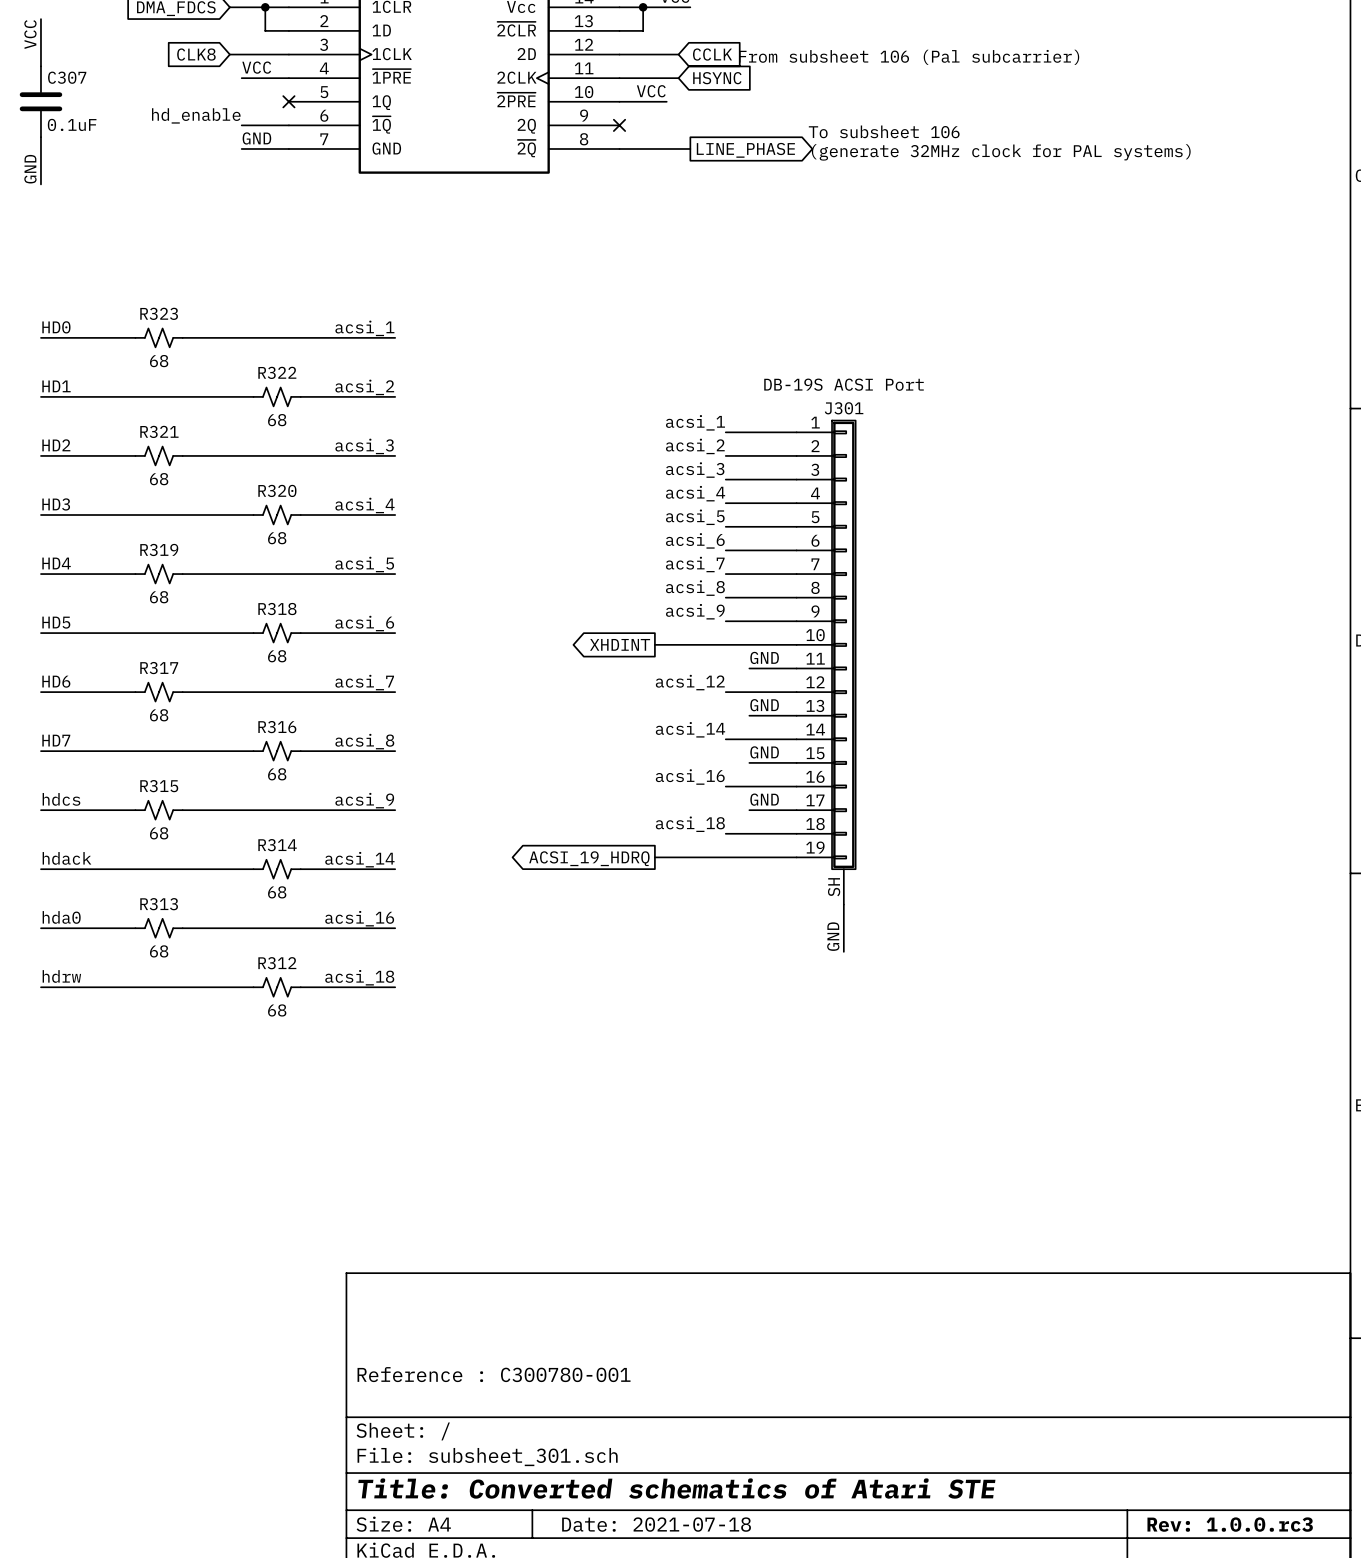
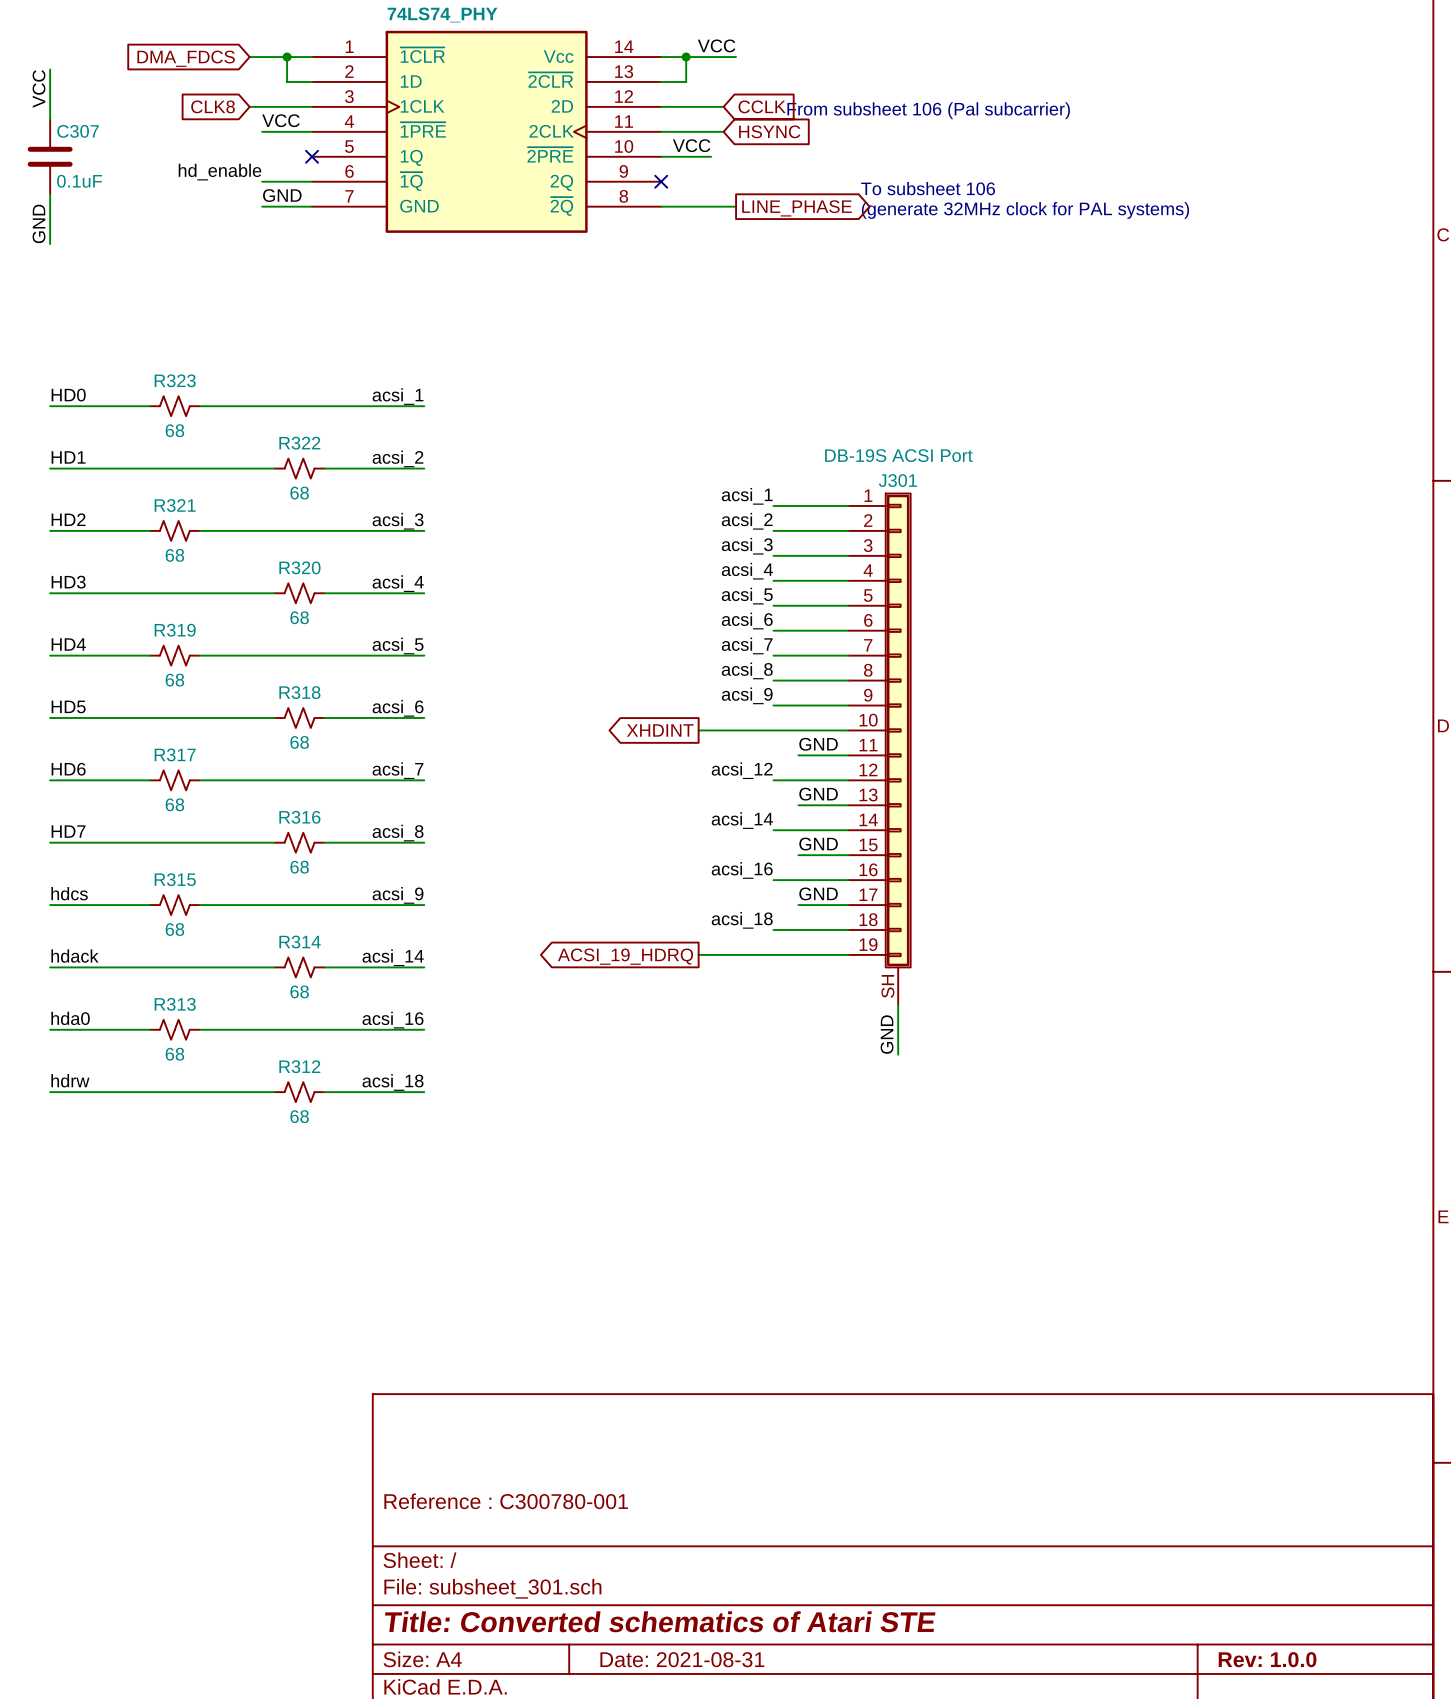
title block: Date: 2021-07-18 (656, 1524) -> Date: 2021-08-31 (682, 1659)
title block: Rev: 1.0.0.rc3 (1230, 1524) -> Rev: 1.0.0 (1267, 1659)

